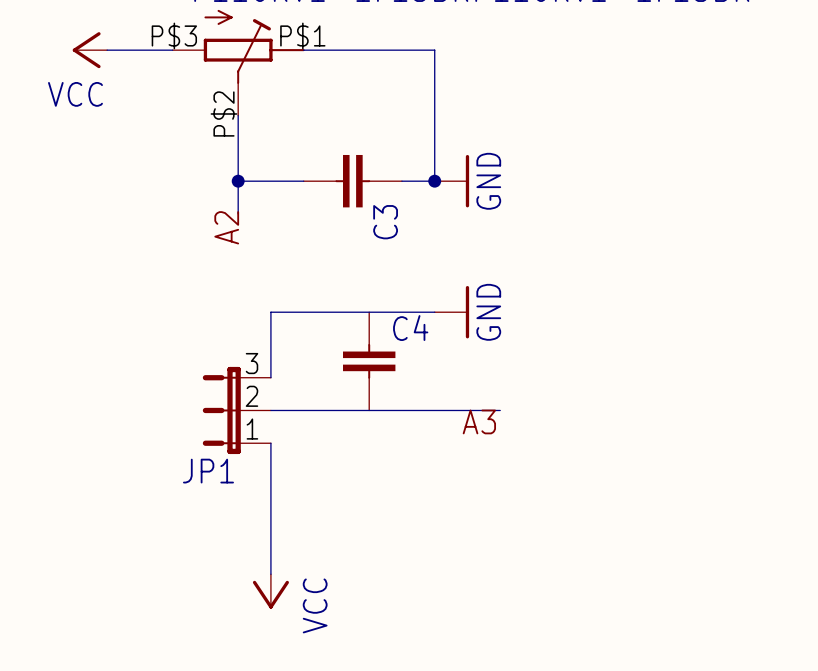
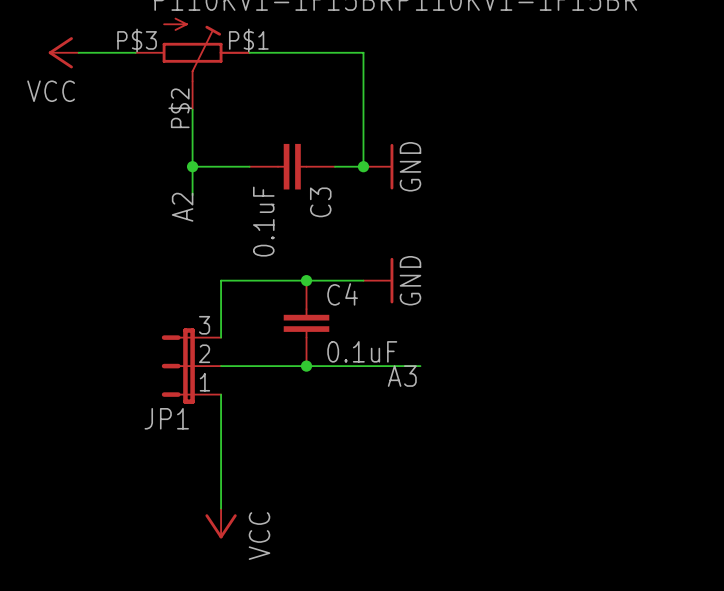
C3 value: none -> 0.1uF (263, 221)
junction: none -> (306, 280)
C4 value: none -> 0.1uF (362, 351)
junction: none -> (306, 366)

